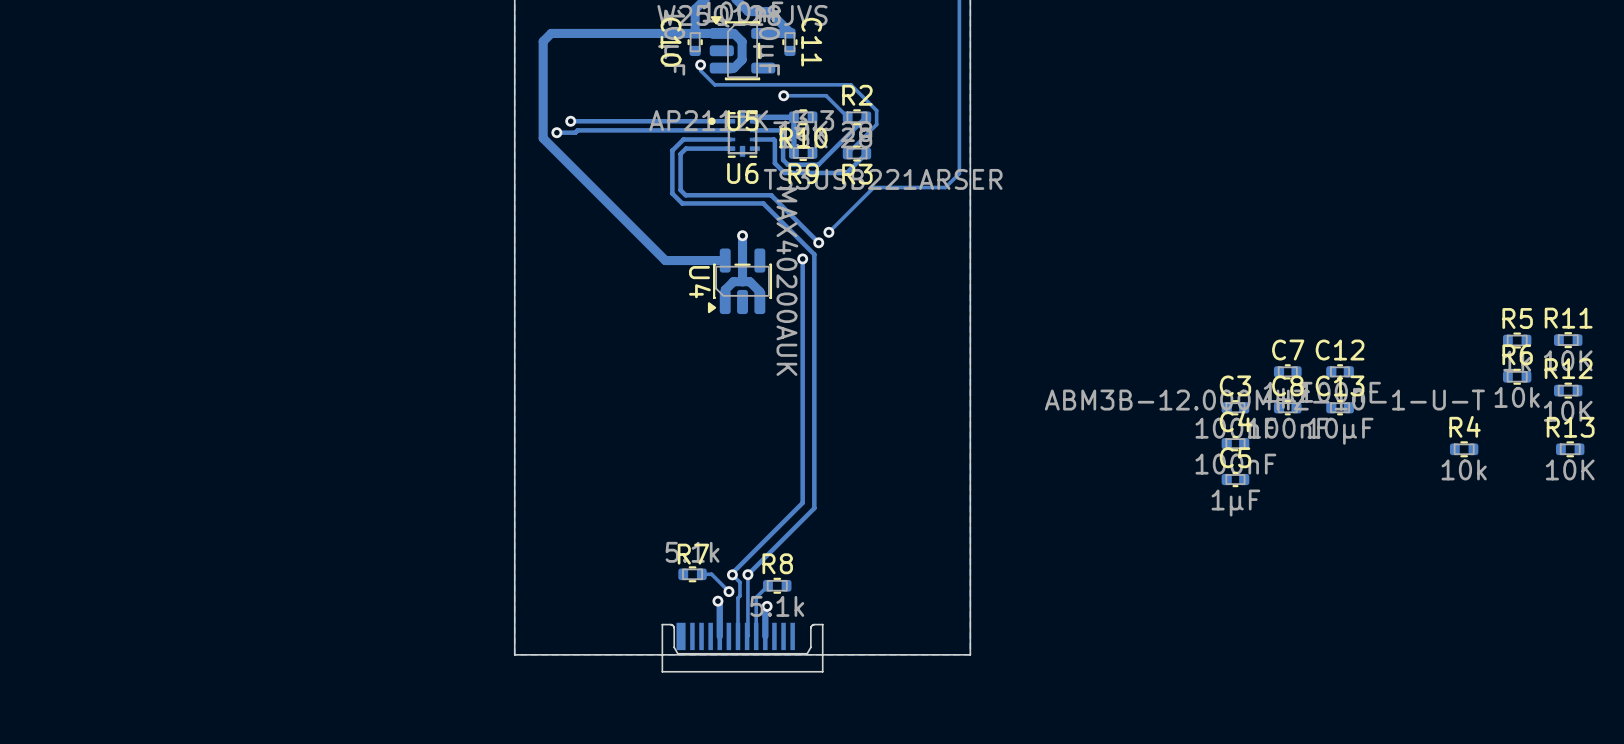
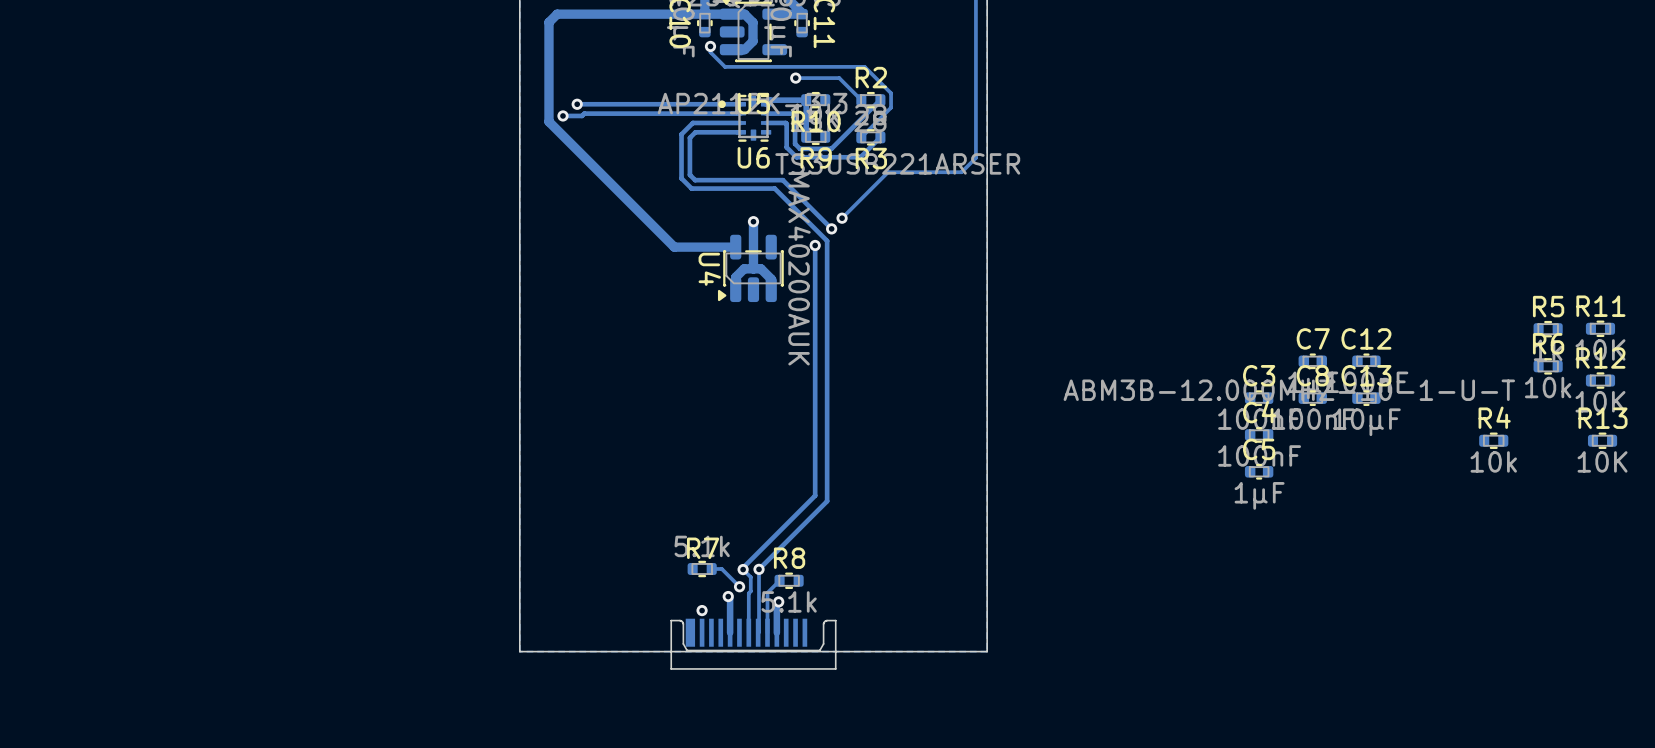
via: none -> (702, 610)

